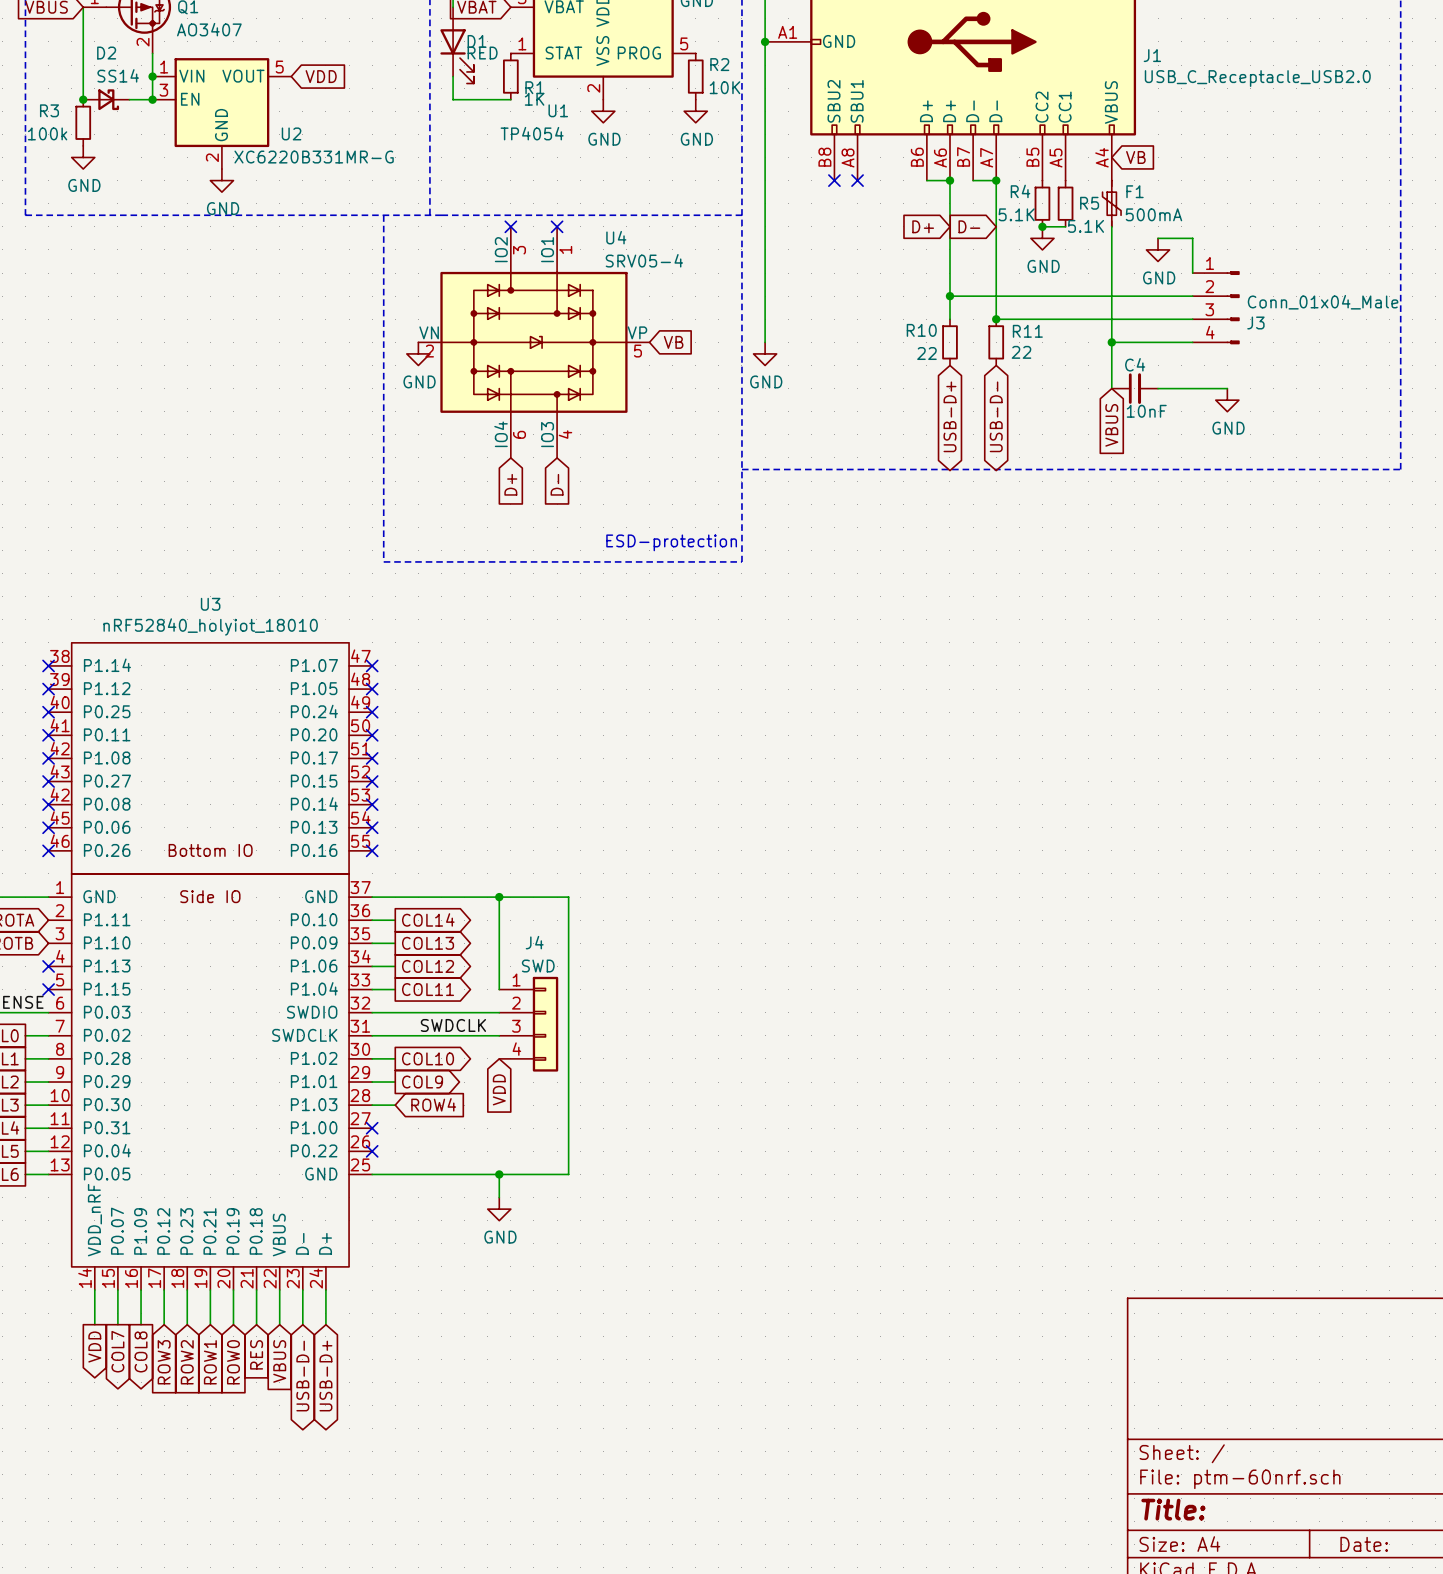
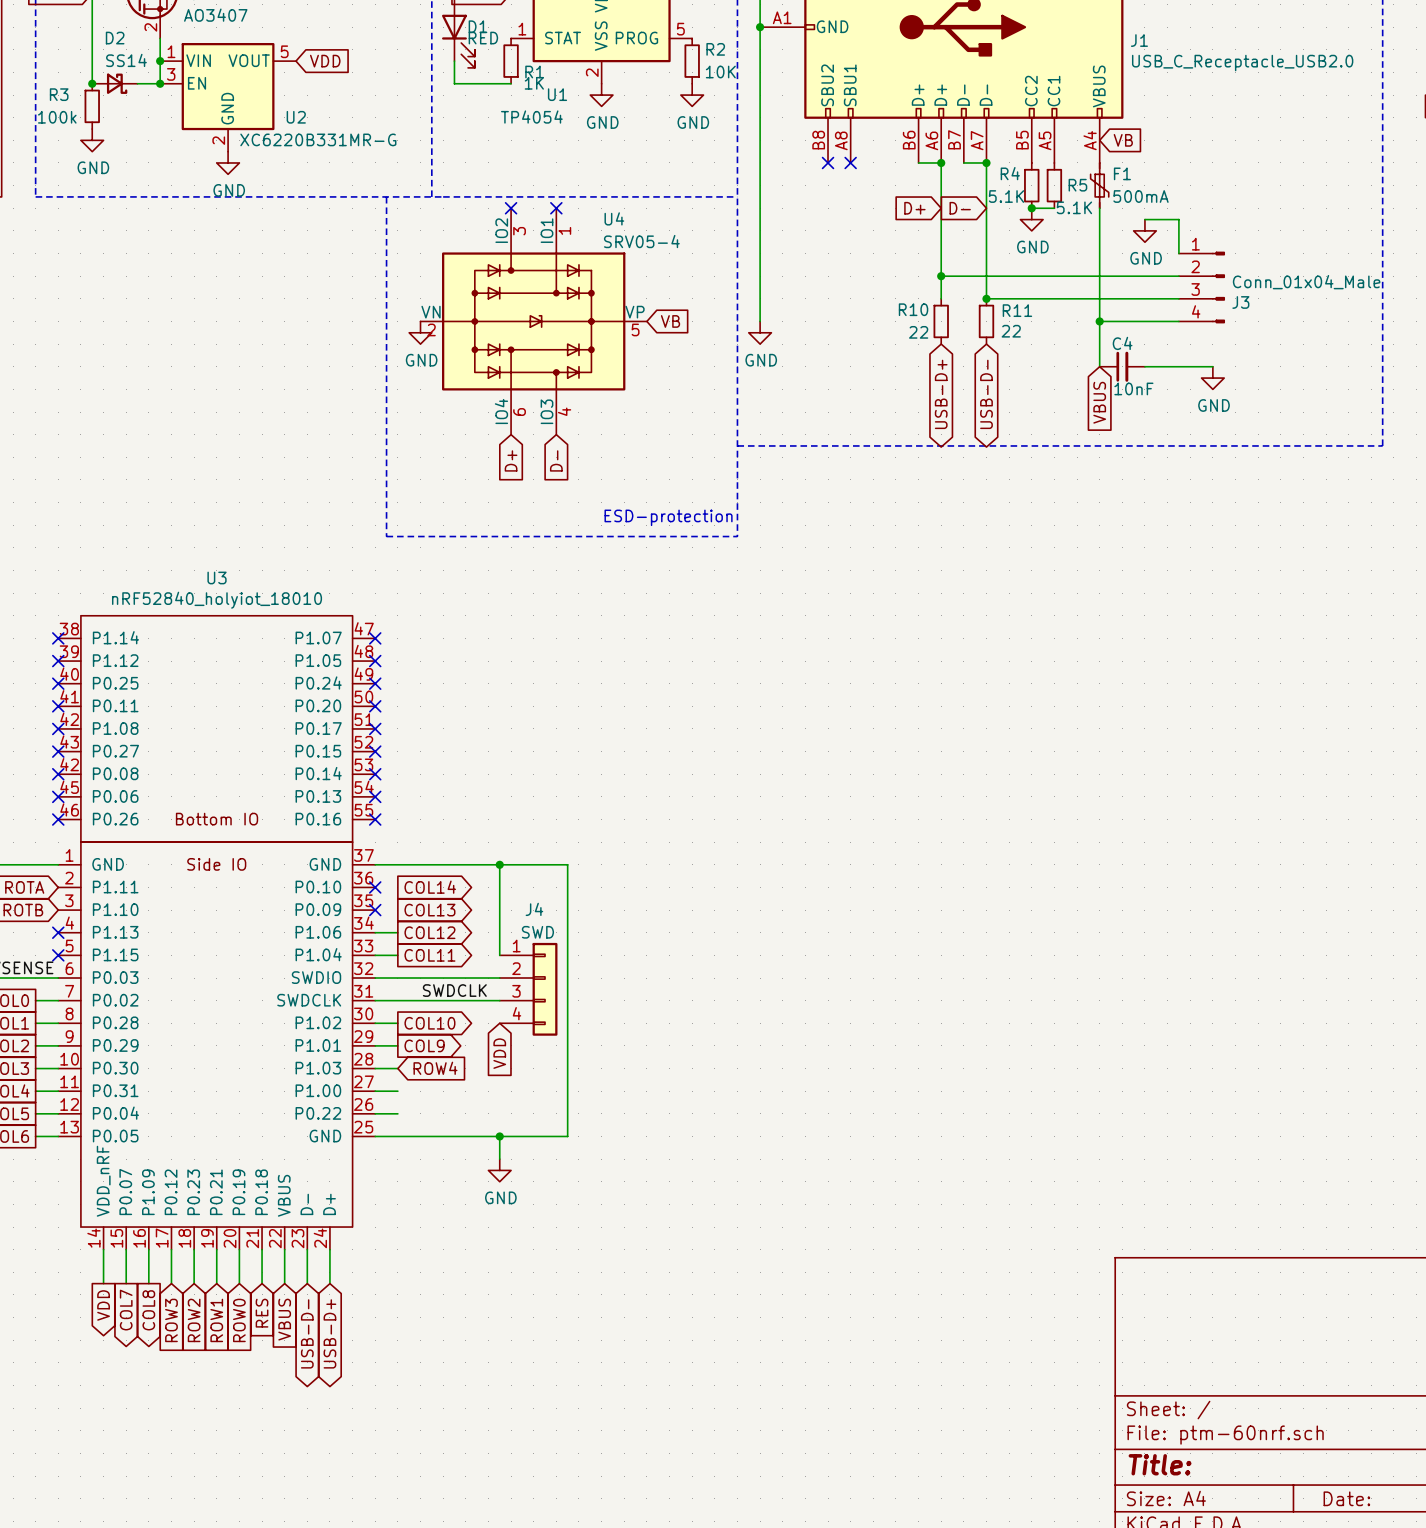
wire: (372, 920) (395, 920) -> (375, 1091) (397, 1091)
no-connect mark: none -> (375, 887)
wire: (372, 943) (395, 943) -> (375, 1113) (397, 1113)
no-connect mark: none -> (375, 910)
no-connect mark: (372, 1128) -> none
no-connect mark: (372, 1151) -> none

